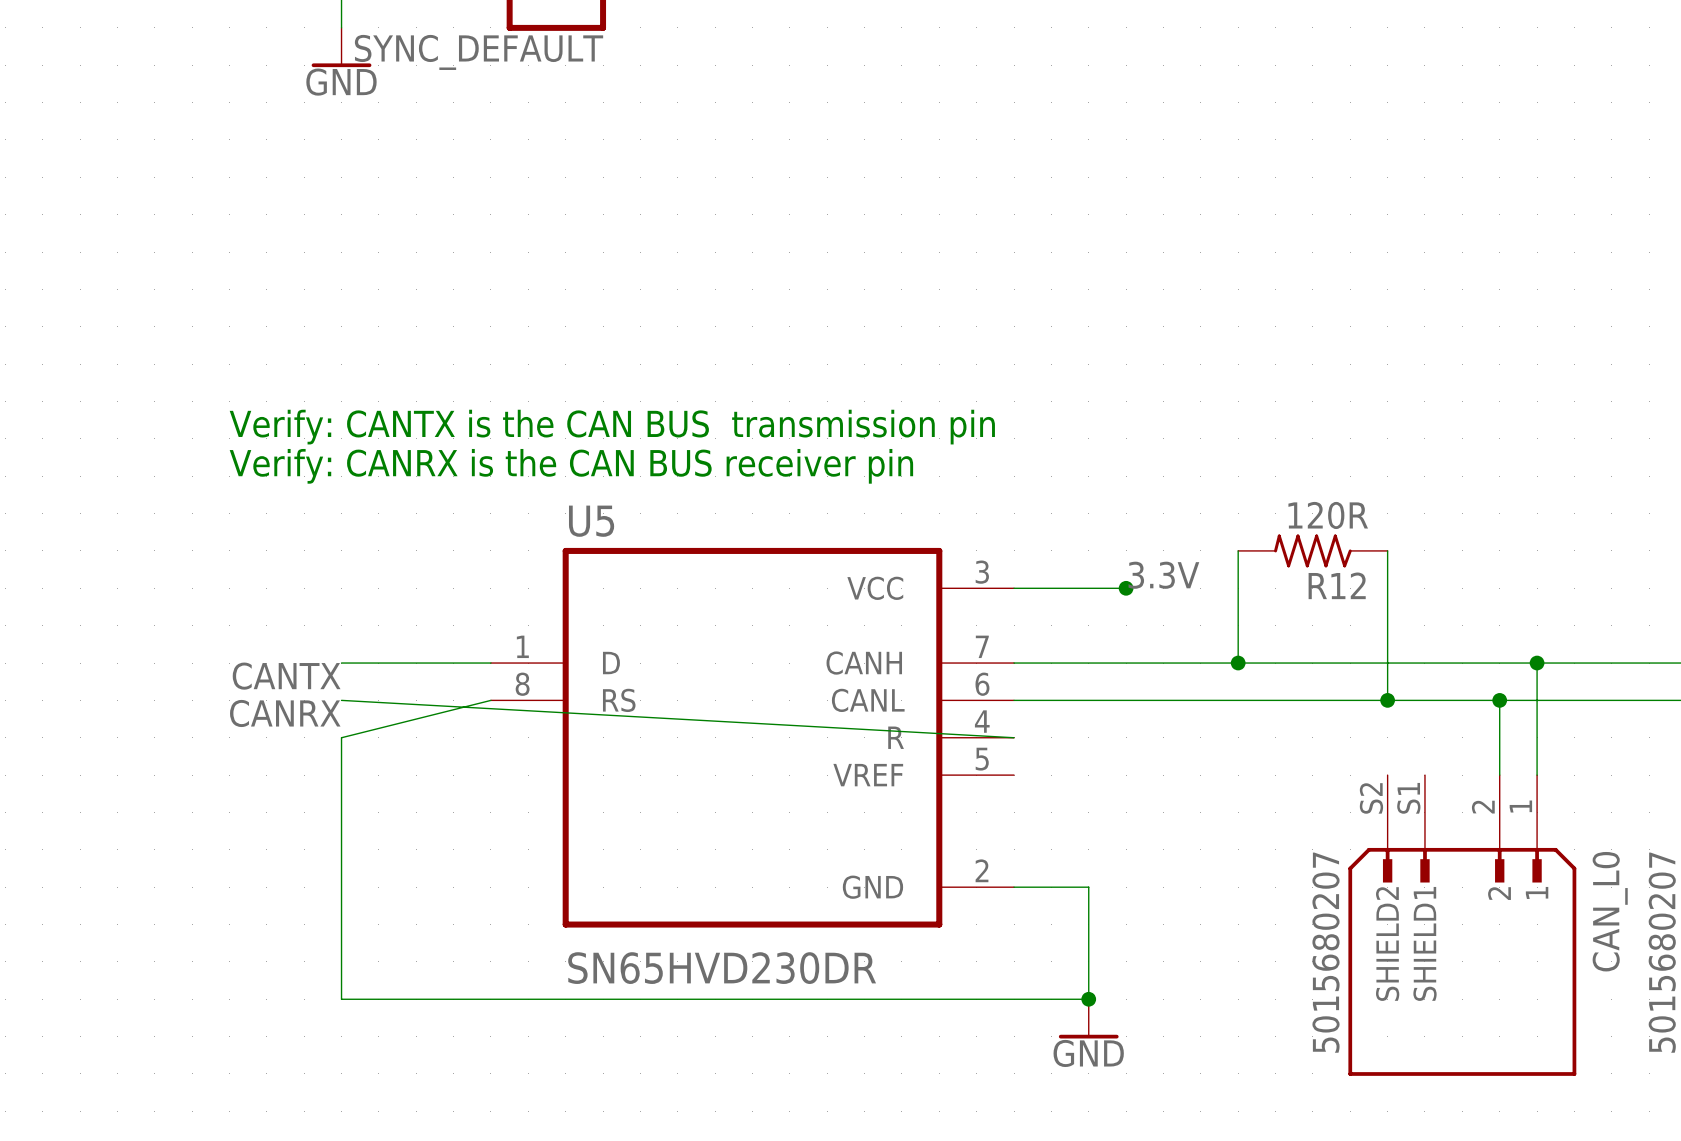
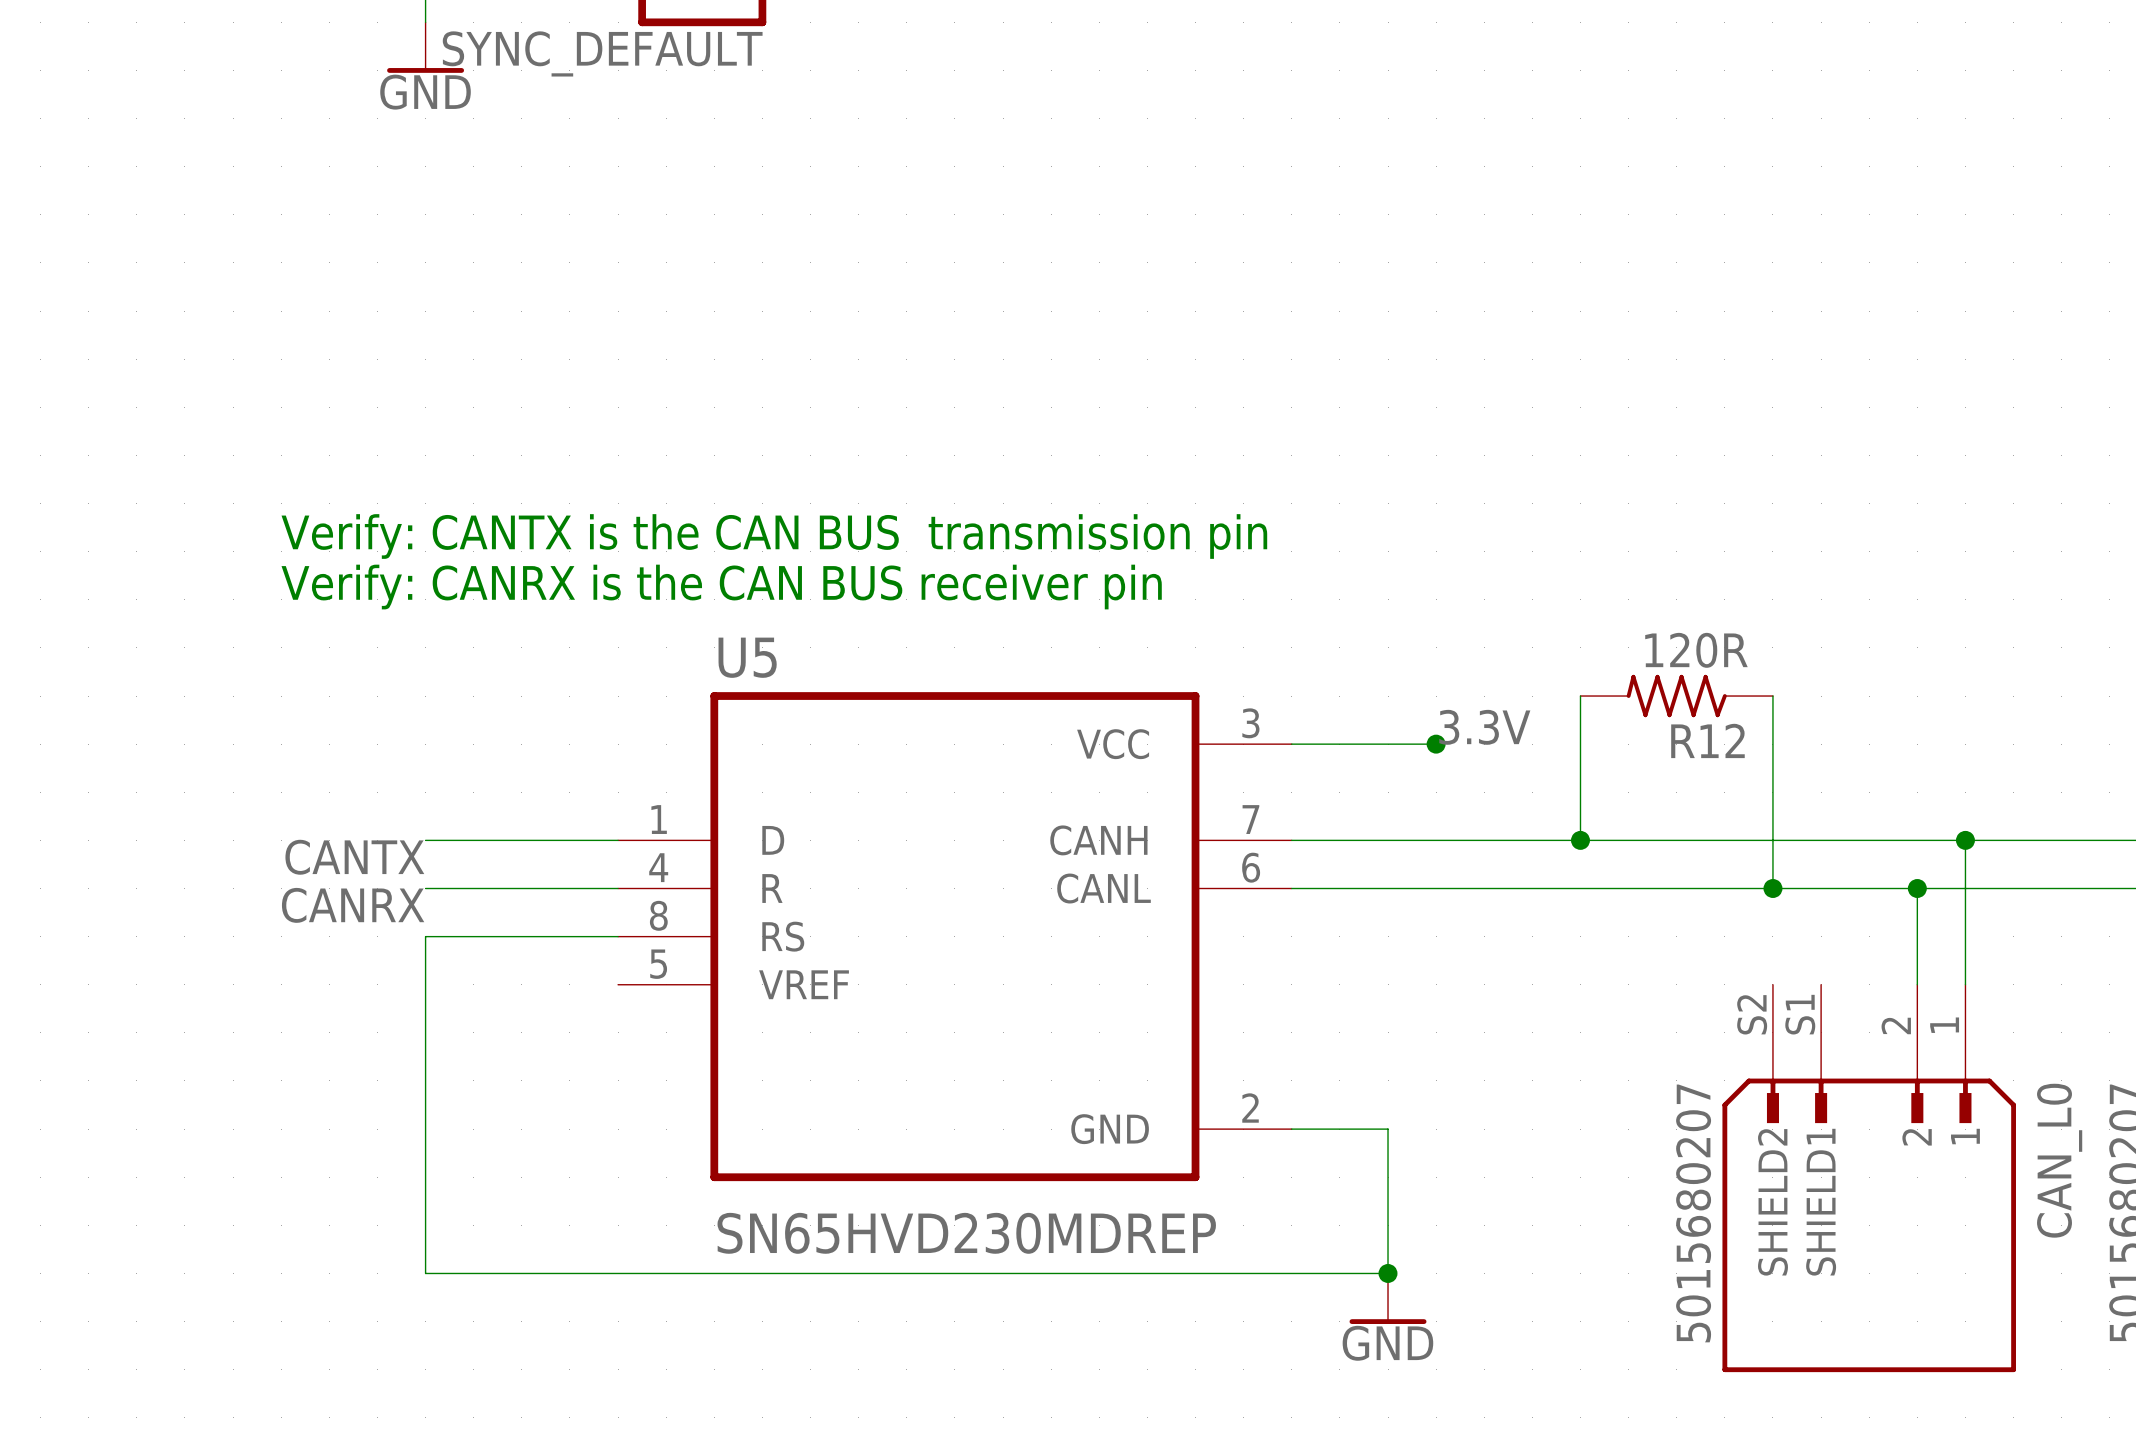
U5 symbol: [490, 547, 1015, 928] -> [618, 692, 1292, 1182]
wire: (341, 700) (1014, 737) -> none
wire: (490, 700) (341, 737) -> (618, 888) (425, 888)
wire: none -> (425, 936) (618, 936)
U5 value: SN65HVD230DR (722, 968) -> SN65HVD230MDREP (966, 1233)

